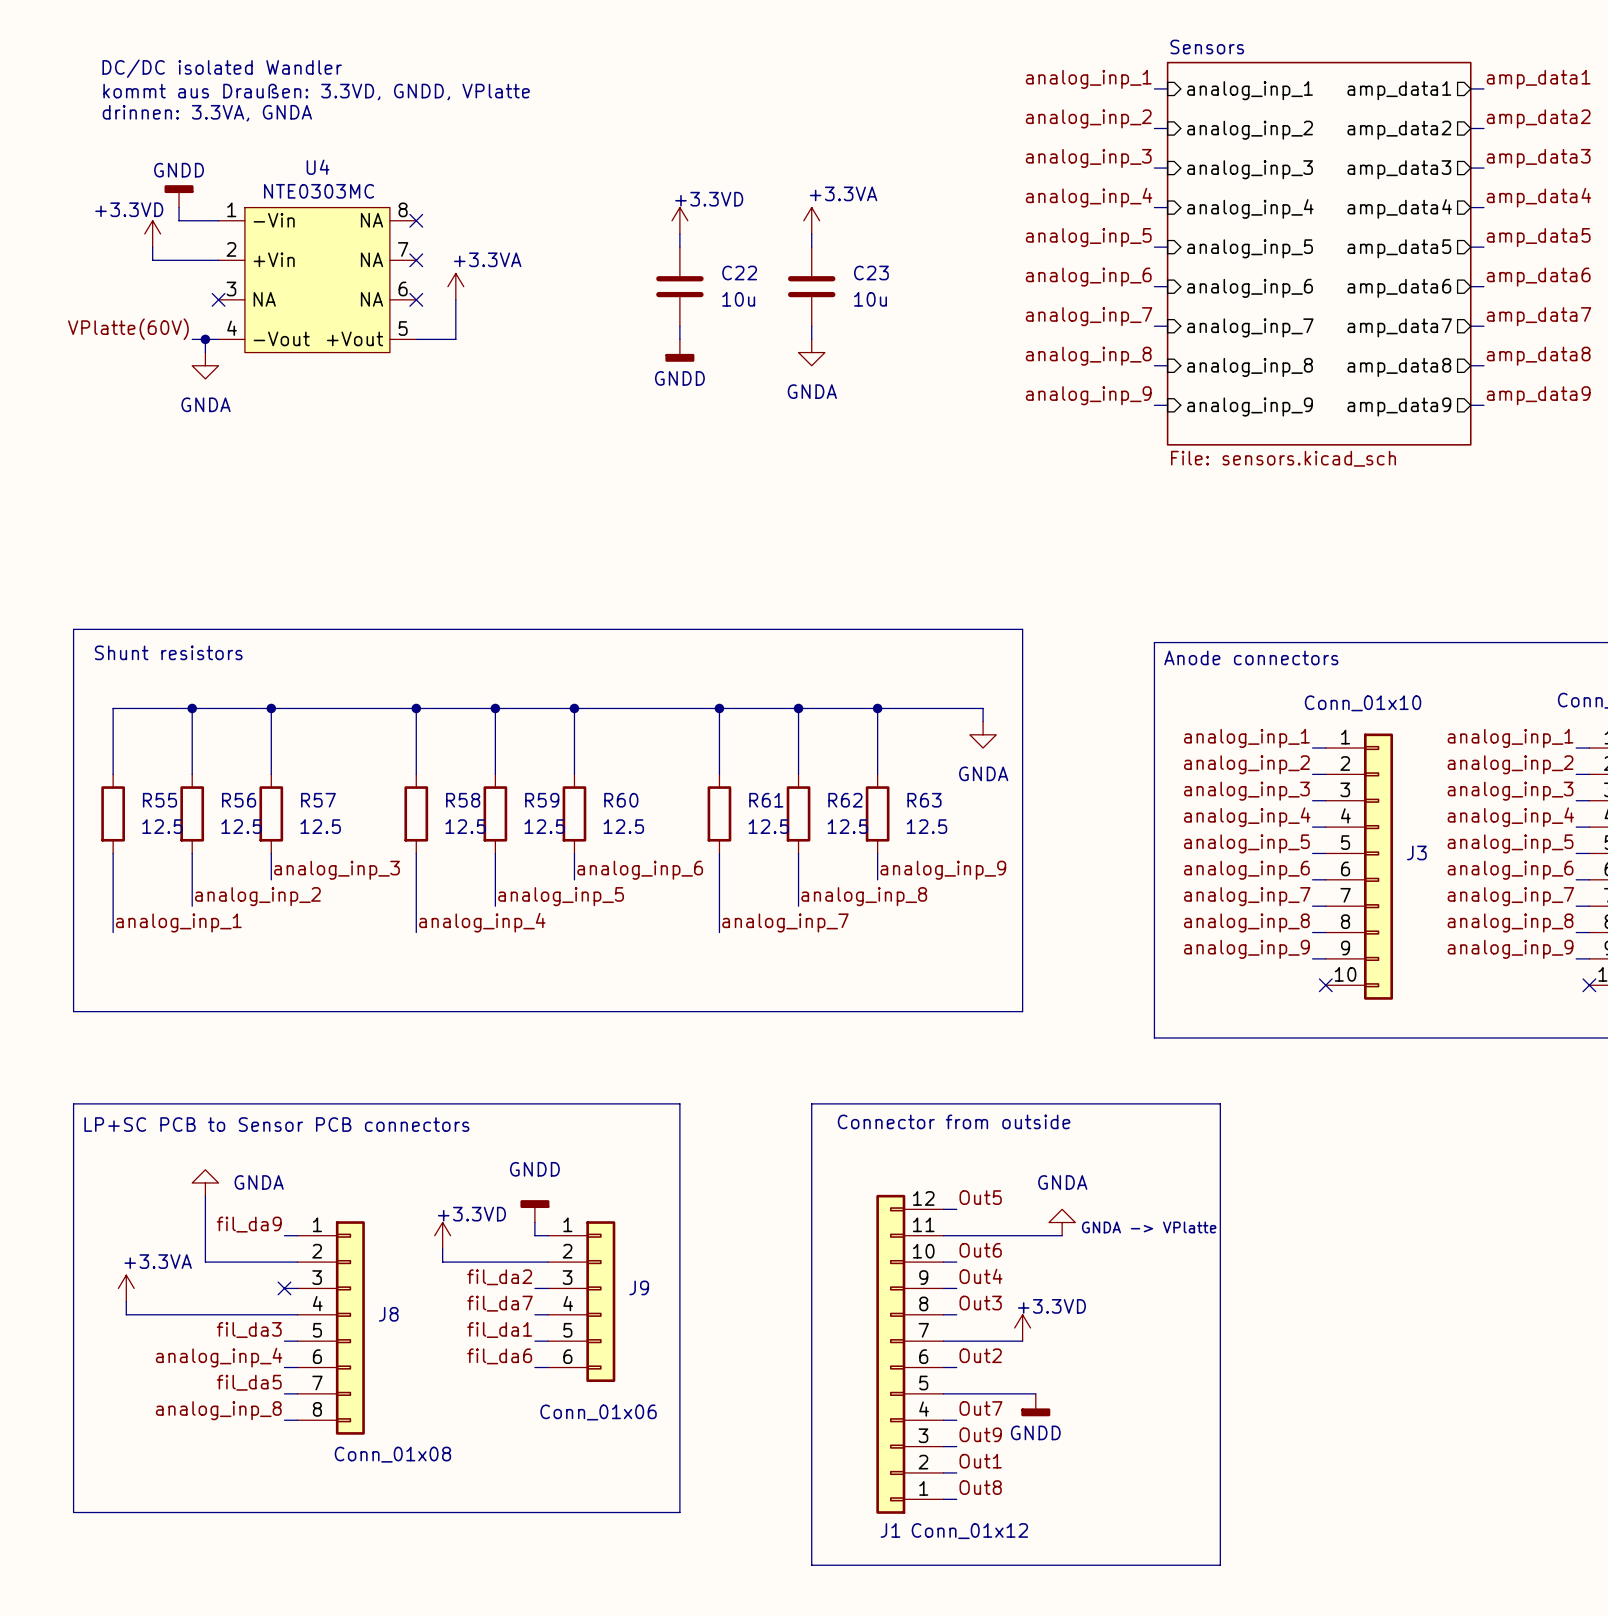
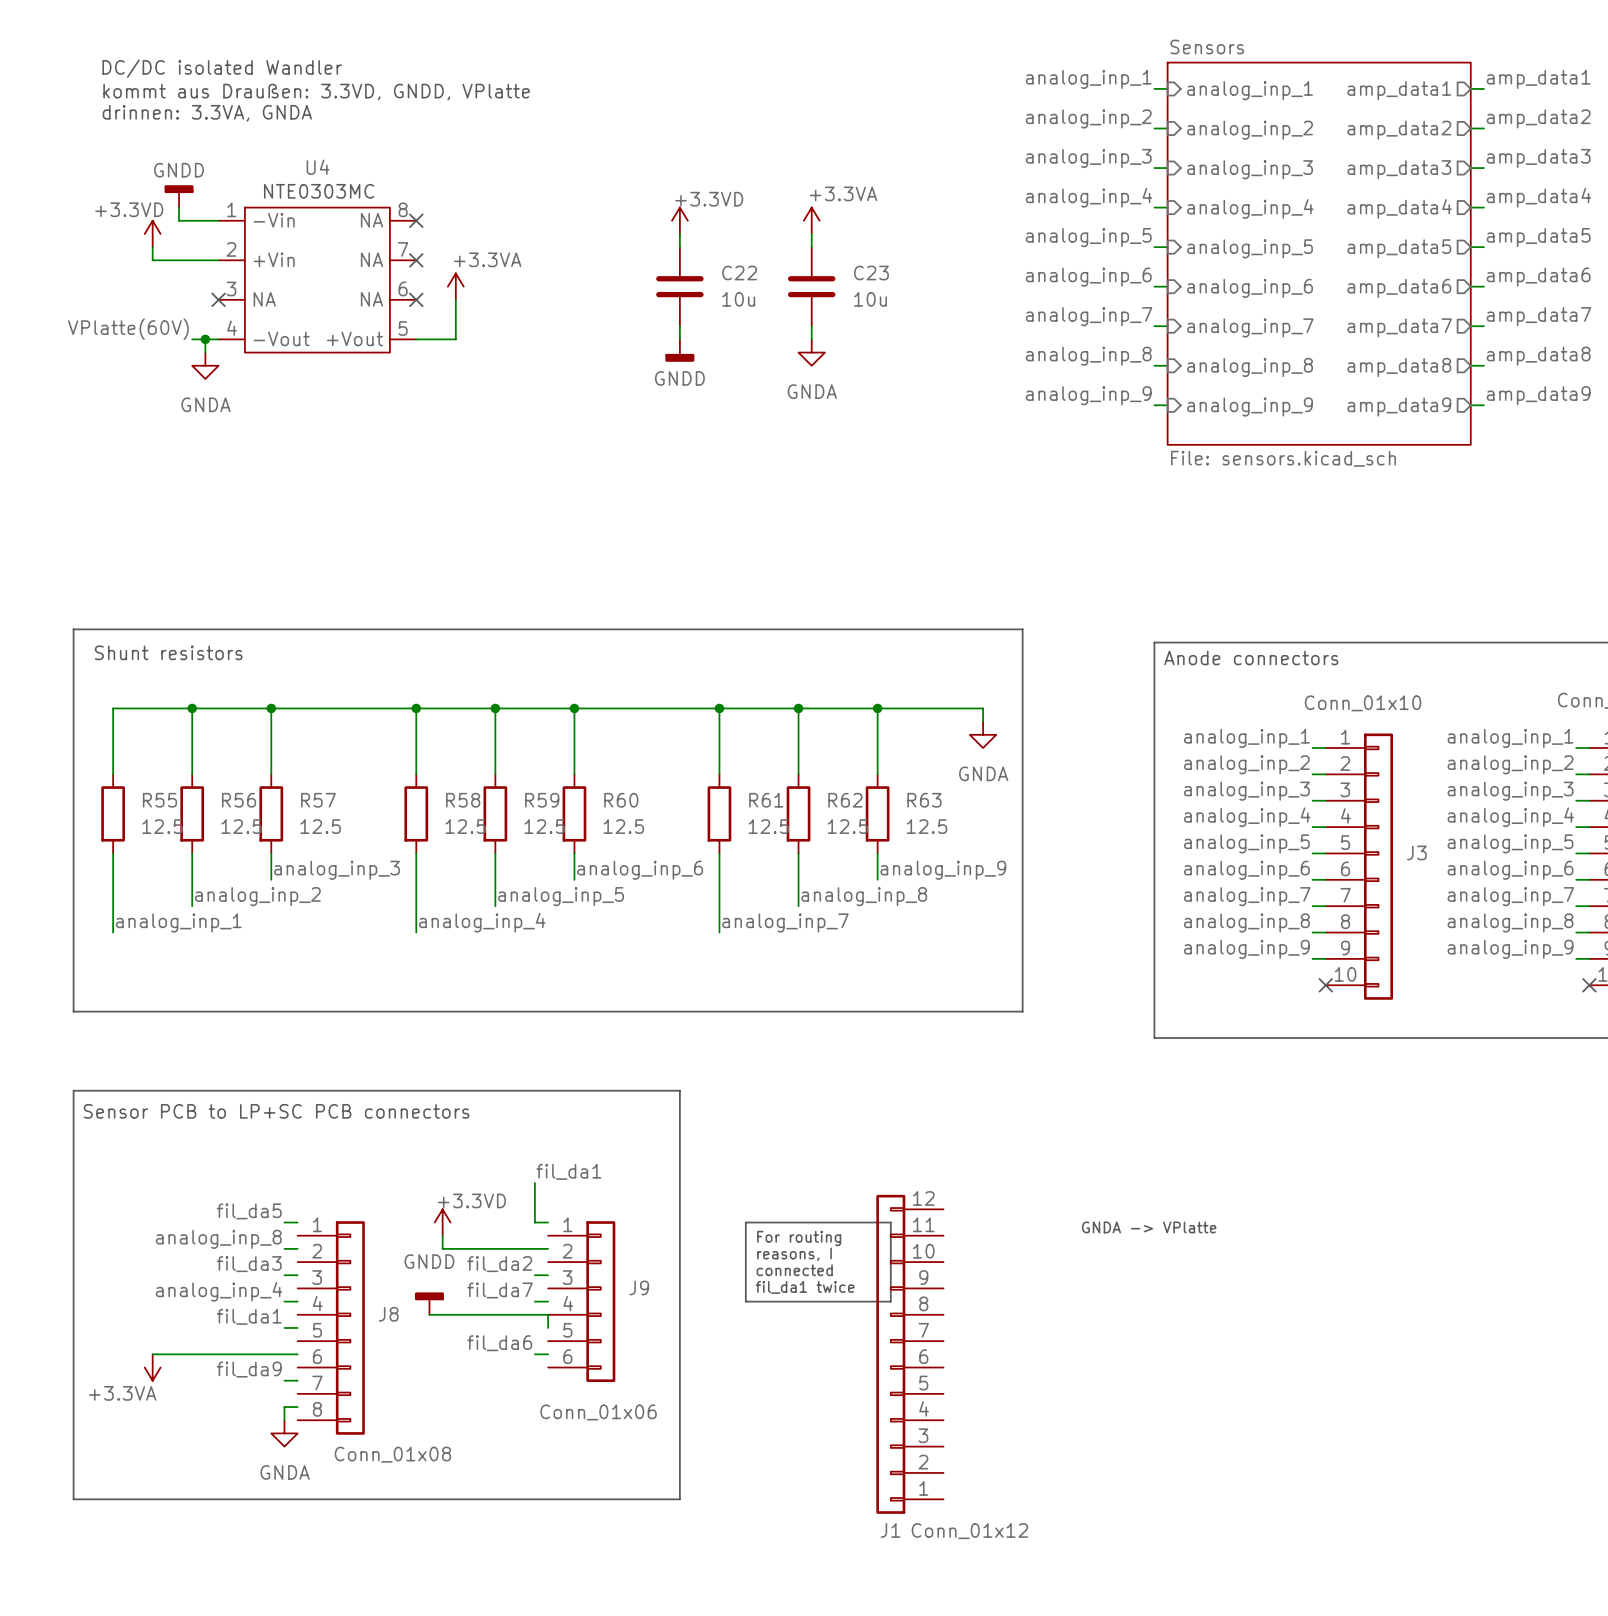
line: (73, 1103) (679, 1103) -> (73, 1103) (73, 1090) (679, 1090) (679, 1103)
line: (811, 1103) (1220, 1103) (1220, 1565) (811, 1565) (811, 1103) -> none
text: Connector from outside (954, 1121) -> none
text: LP+SC PCB to Sensor PCB connectors (276, 1124) -> Sensor PCB to LP+SC PCB connectors (276, 1111)
label: none -> fil_da1 (568, 1171)
power symbol: GNDA (205, 1182) -> none
wire: none -> (534, 1182) (534, 1222) (548, 1222)
wire: (205, 1196) (205, 1262) (297, 1262) -> none
label: Out5 (980, 1197) -> none
wire: (943, 1209) (956, 1209) -> none
power symbol position: GNDD (534, 1211) -> GNDD (429, 1303)
wire: (534, 1222) (534, 1235) (548, 1235) -> none
line: none -> (745, 1222) (890, 1222) (890, 1301) (745, 1301) (745, 1222)
power symbol: GNDA (1062, 1222) -> none
label position: fil_da9 (249, 1224) -> fil_da9 (249, 1369)
wire: (284, 1235) (297, 1235) -> (284, 1222) (297, 1222)
power symbol position: +3.3VD (442, 1235) -> +3.3VD (442, 1222)
wire: (943, 1235) (1062, 1235) -> none
text: none -> For routing (799, 1238)
wire: none -> (284, 1248) (297, 1248)
wire: (442, 1248) (442, 1262) (548, 1262) -> (442, 1235) (442, 1248) (548, 1248)
label: Out6 (980, 1250) -> none
text: none -> reasons, I (794, 1254)
wire: (943, 1262) (956, 1262) -> none
text: none -> connected (794, 1270)
label: Out4 (980, 1276) -> none
label position: fil_da2 (499, 1277) -> fil_da2 (499, 1264)
text: none -> fil_da1 twice (805, 1287)
power symbol rotation: 0° (126, 1288) -> 180° (152, 1367)
power symbol position: +3.3VA (126, 1288) -> +3.3VA (152, 1367)
wire: (284, 1288) (297, 1288) -> (284, 1275) (297, 1275)
no-connect mark: (284, 1288) -> none
wire: (534, 1288) (548, 1288) -> (534, 1275) (548, 1275)
wire: (943, 1288) (956, 1288) -> none
wire: (126, 1301) (126, 1314) (297, 1314) -> none
label position: fil_da7 (499, 1303) -> fil_da7 (499, 1290)
label: Out3 (980, 1303) -> none
wire: none -> (429, 1314) (534, 1314)
wire: none -> (548, 1314) (548, 1327)
wire: (943, 1314) (956, 1314) -> none
label: none -> fil_da1 (249, 1316)
power symbol: +3.3VD (1022, 1327) -> none
label position: fil_da3 (249, 1330) -> fil_da3 (249, 1264)
label: fil_da1 (499, 1330) -> none
wire: (284, 1341) (297, 1341) -> (284, 1327) (297, 1327)
wire: (534, 1341) (548, 1341) -> (534, 1301) (548, 1301)
wire: (943, 1341) (1022, 1341) -> none
wire: none -> (152, 1354) (297, 1354)
label: Out2 (980, 1355) -> none
label position: fil_da6 (499, 1356) -> fil_da6 (499, 1343)
label position: analog_inp_4 (219, 1357) -> analog_inp_4 (219, 1291)
wire: (284, 1367) (297, 1367) -> (284, 1301) (297, 1301)
wire: (534, 1367) (548, 1367) -> (534, 1354) (548, 1354)
wire: (943, 1367) (956, 1367) -> none
label position: fil_da5 (249, 1382) -> fil_da5 (249, 1211)
wire: (284, 1393) (297, 1393) -> (284, 1380) (297, 1380)
wire: (943, 1393) (1035, 1393) -> none
power symbol: GNDD (1035, 1405) -> none
label: Out7 (980, 1408) -> none
label position: analog_inp_8 (218, 1410) -> analog_inp_8 (218, 1239)
wire: (284, 1420) (297, 1420) -> (284, 1420) (284, 1407) (297, 1407)
wire: (943, 1420) (956, 1420) -> none
power symbol: none -> GNDA (284, 1433)
label: Out9 (980, 1434) -> none
wire: (943, 1446) (956, 1446) -> none
label: Out1 (980, 1461) -> none
wire: (943, 1472) (956, 1472) -> none
label: Out8 (980, 1487) -> none
line: (73, 1499) (73, 1512) (679, 1512) (679, 1499) -> (73, 1499) (679, 1499)
wire: (943, 1499) (956, 1499) -> none

